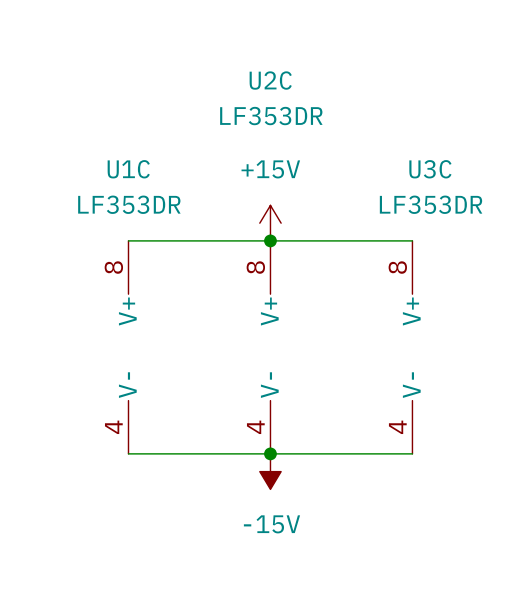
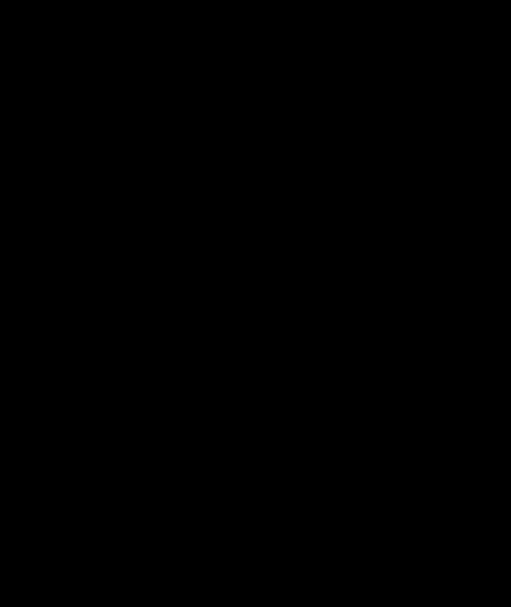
power symbol: +15V (270, 223) -> none
wire: (128, 240) (412, 240) -> none
junction: (270, 240) -> none
U1C: LF353DR (128, 347) -> none
U2C: LF353DR (270, 347) -> none
U3C: LF353DR (412, 347) -> none
wire: (128, 453) (412, 453) -> none
junction: (270, 453) -> none
power symbol: -15V (270, 471) -> none

